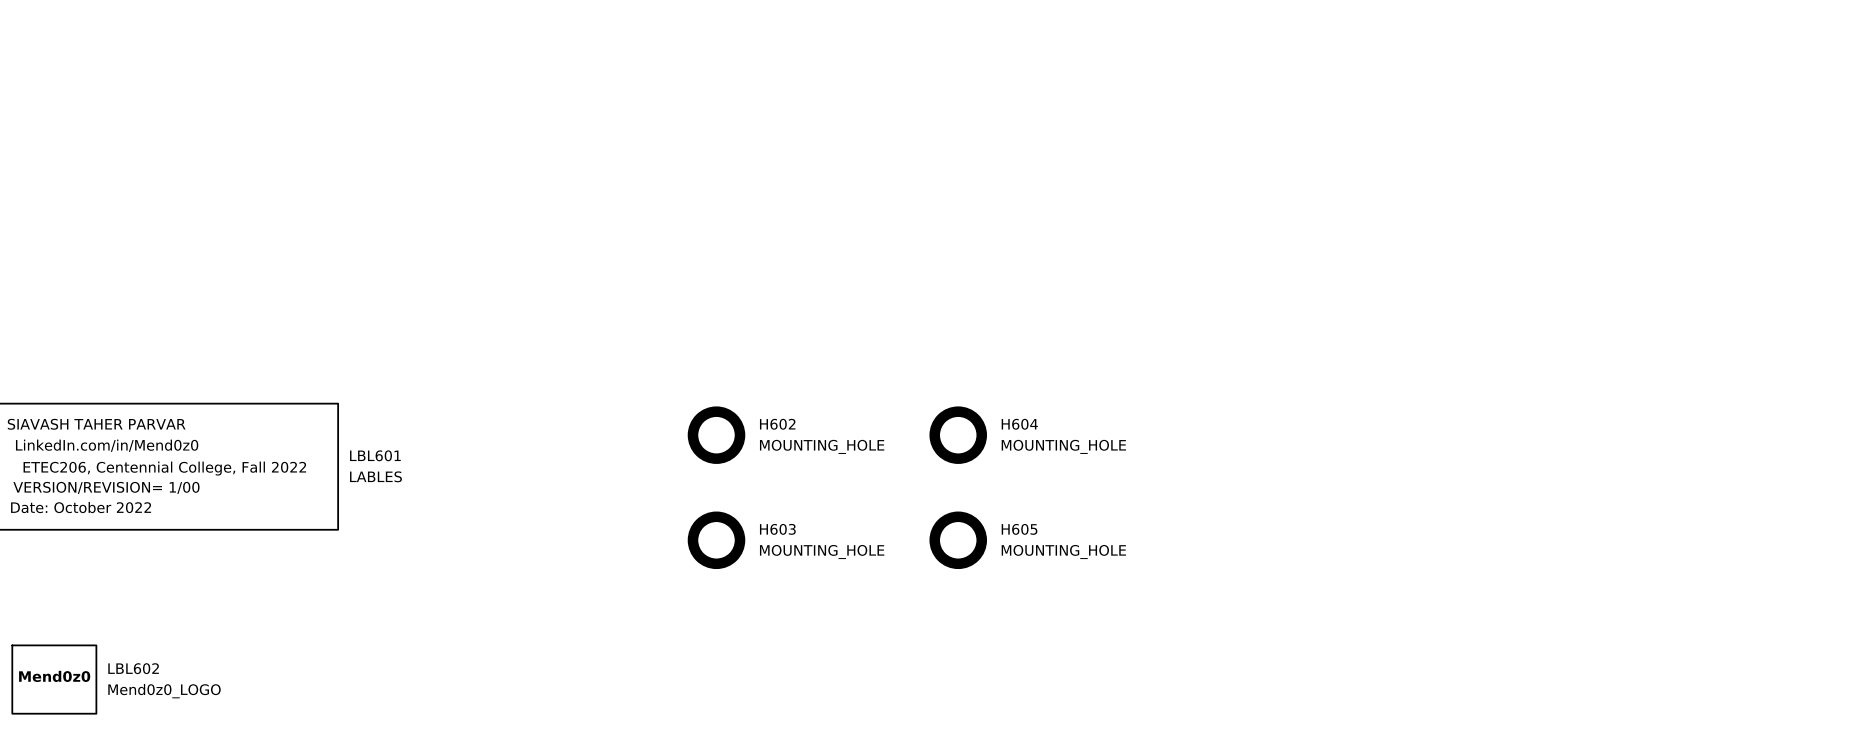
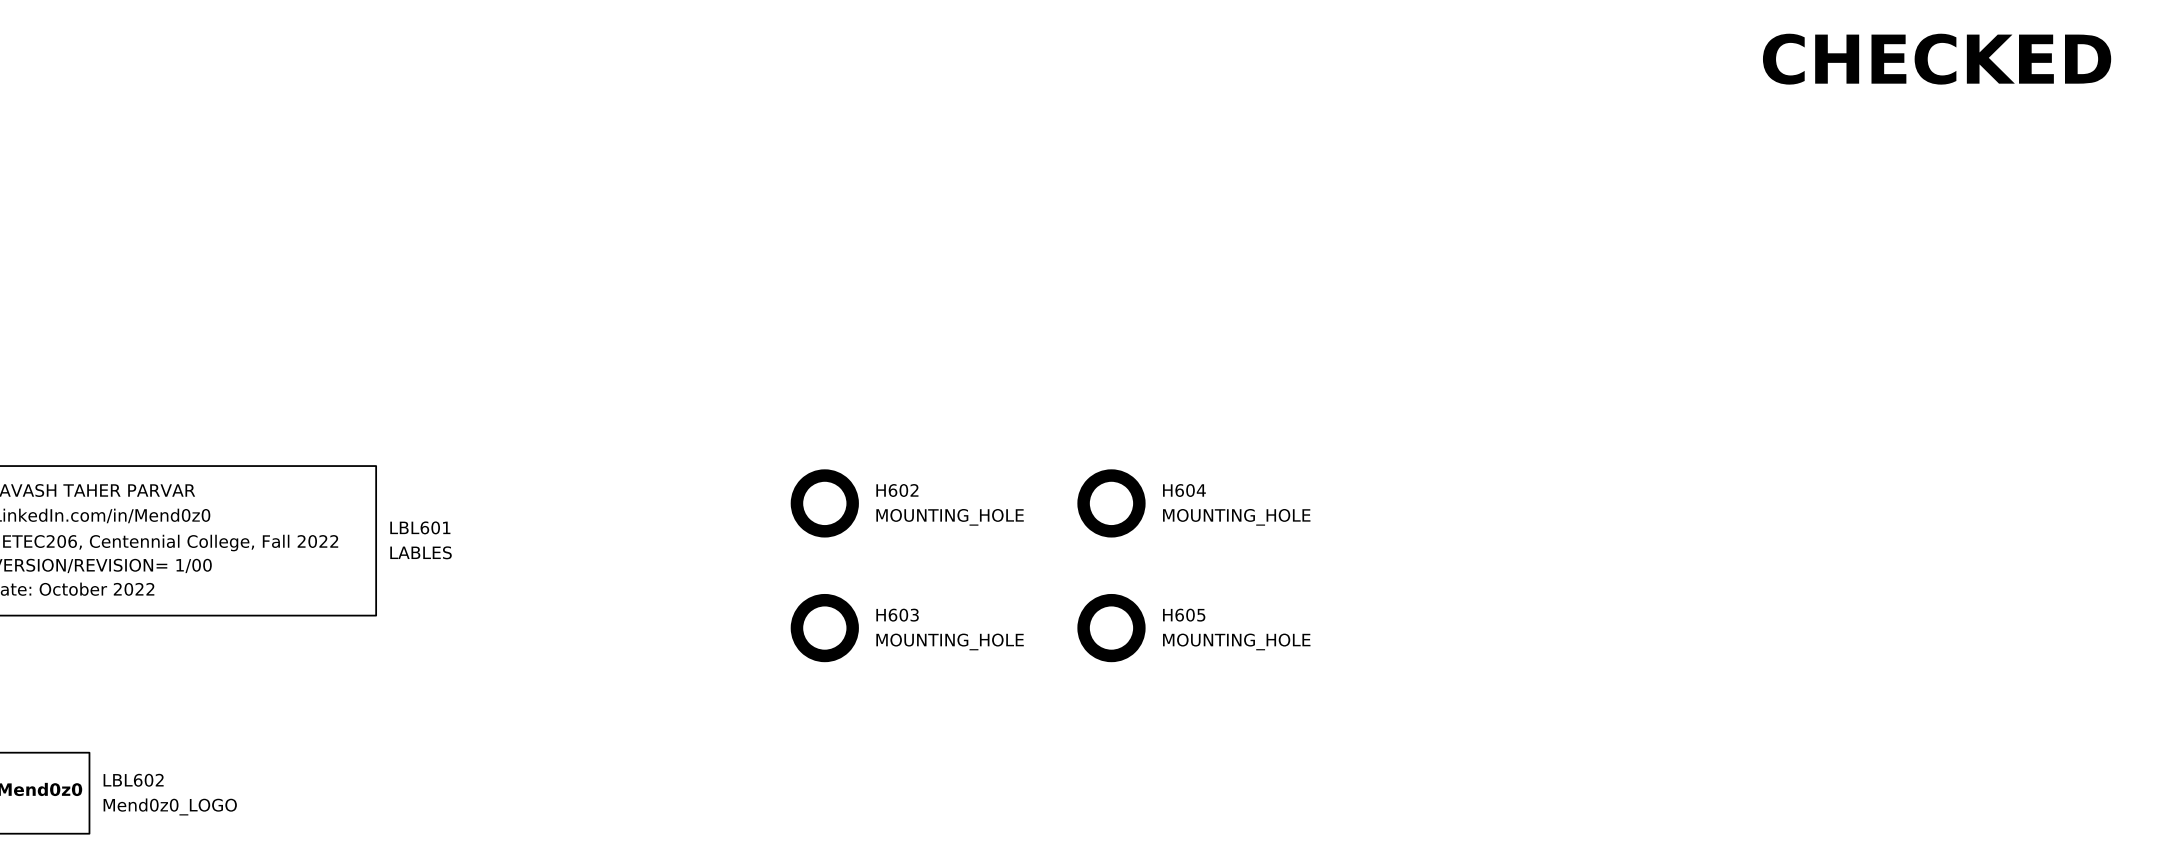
text: none -> CHECKED (1937, 59)

